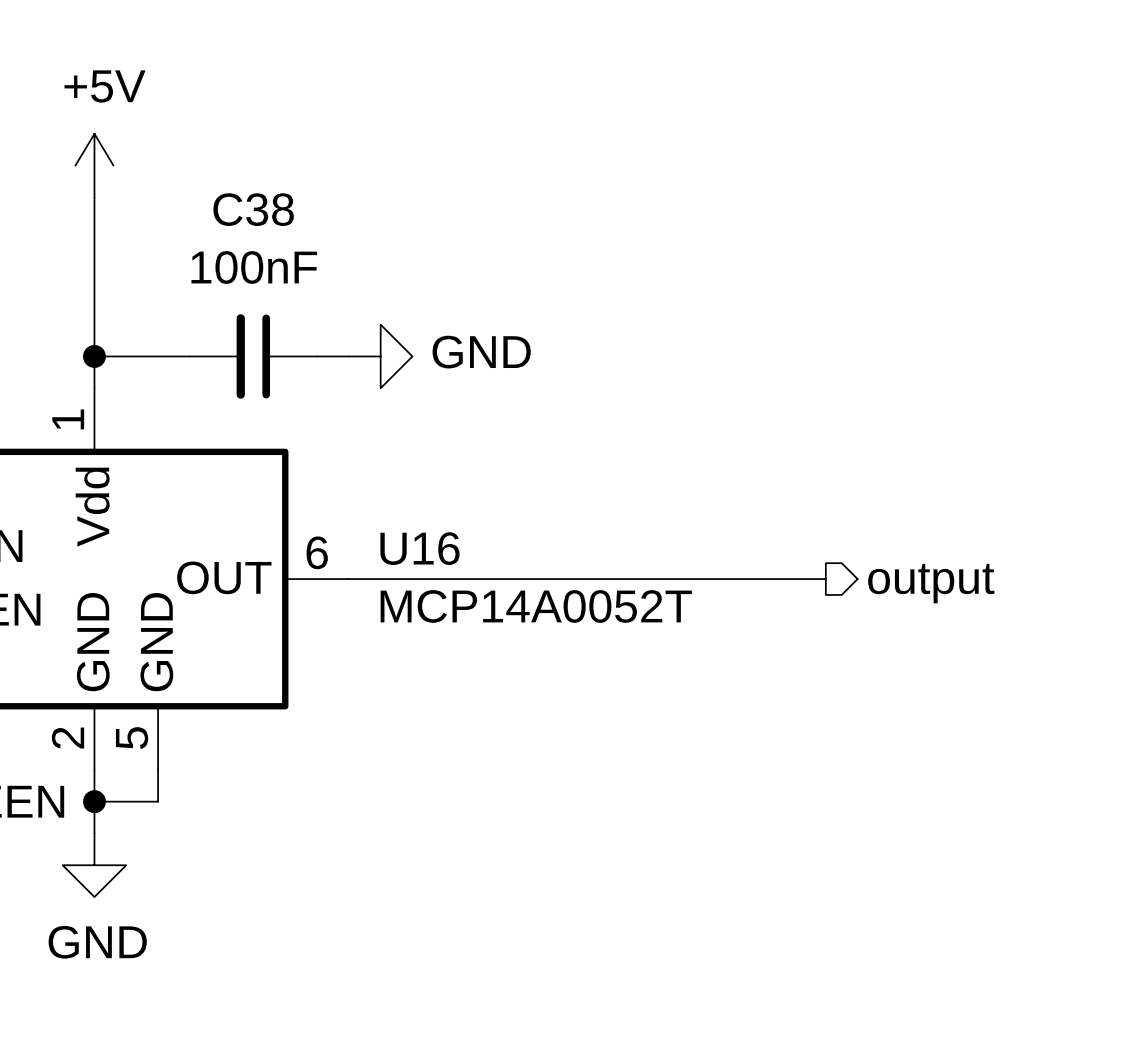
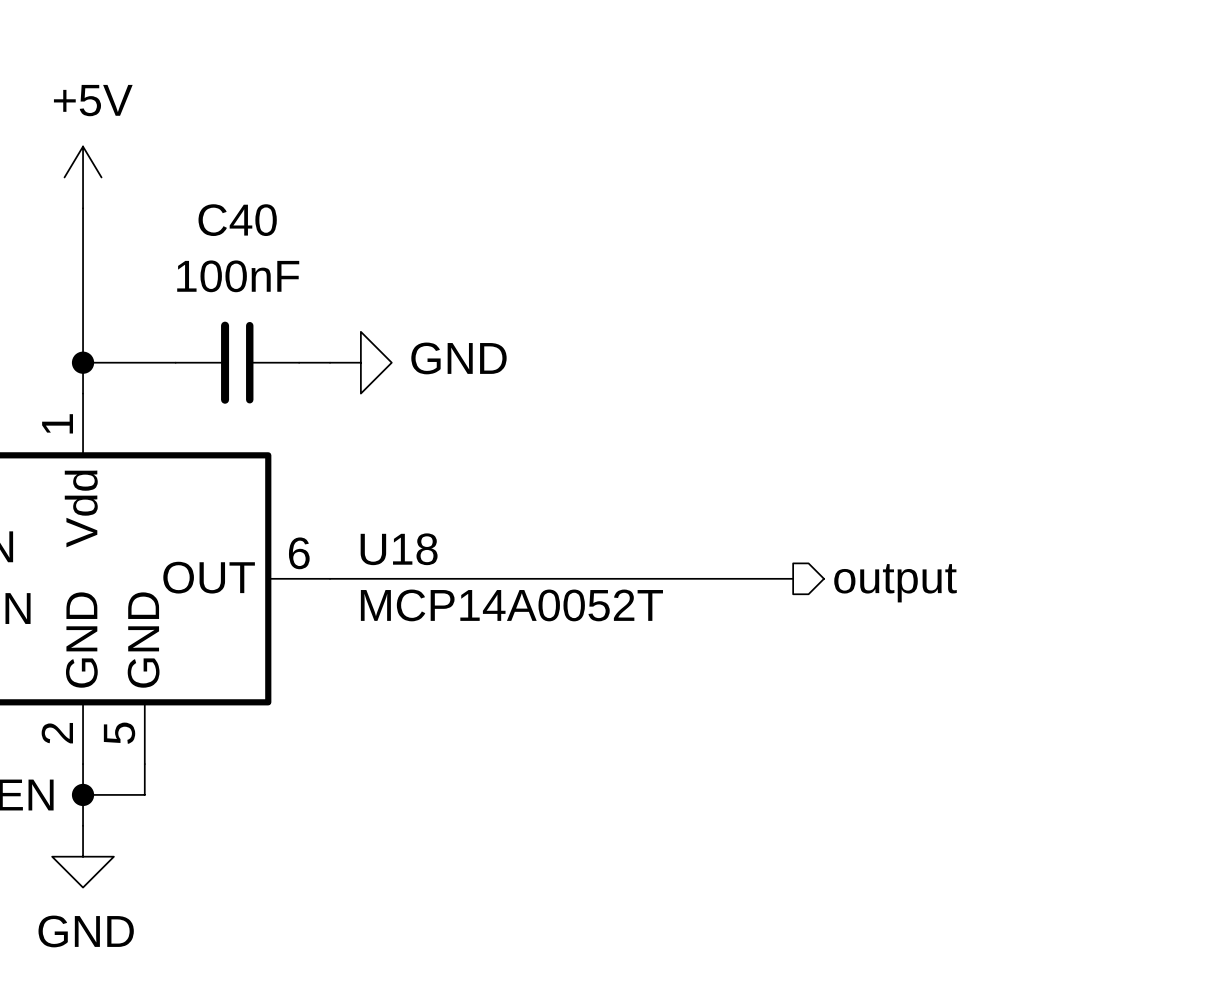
C38 name: C38 (253, 209) -> C40 (237, 220)
U16 name: U16 (420, 548) -> U18 (399, 549)

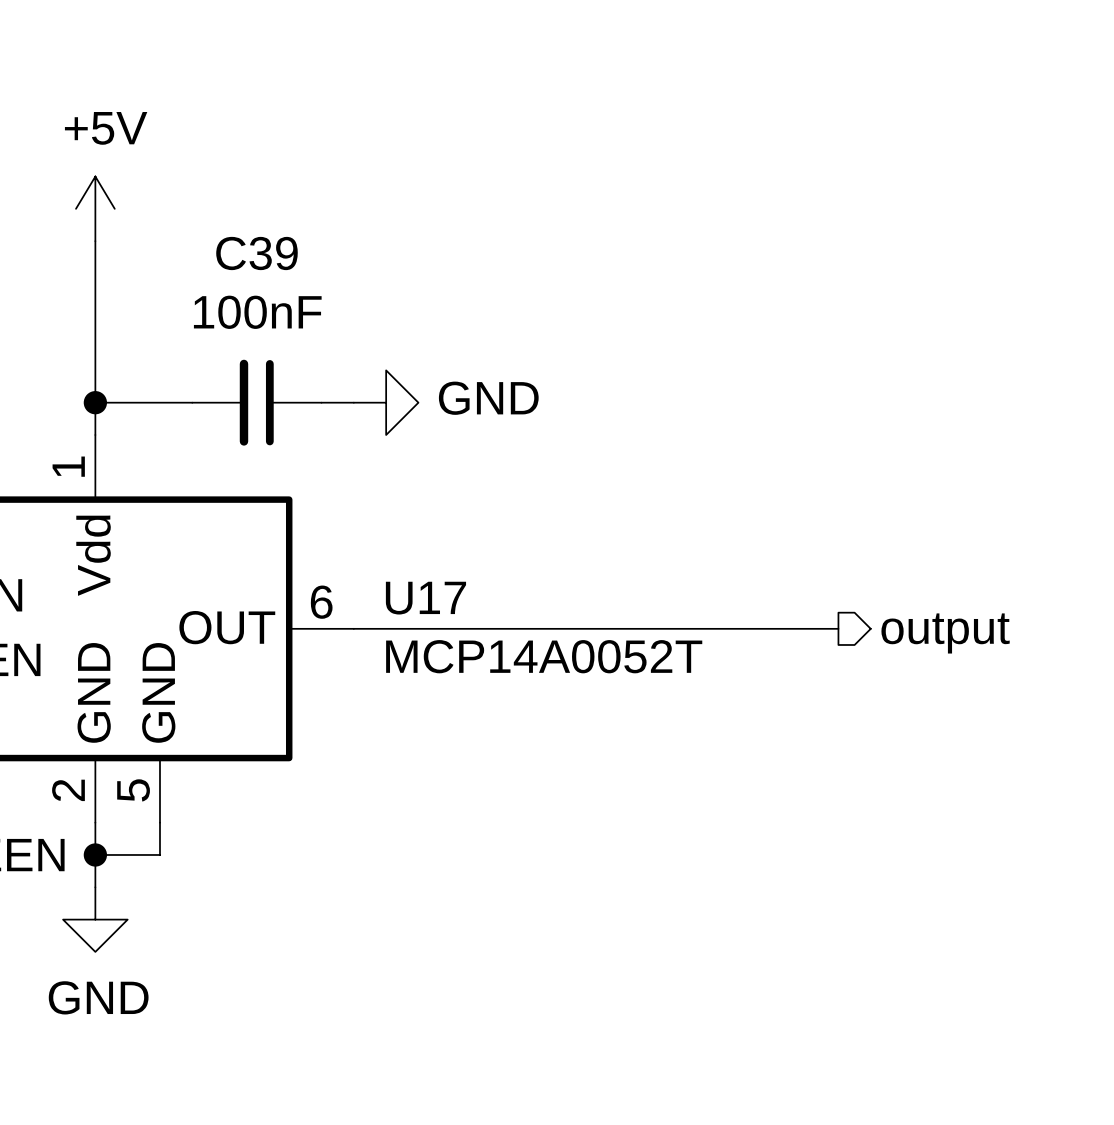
C40 name: C40 (237, 220) -> C39 (256, 253)
U18 name: U18 (399, 549) -> U17 (425, 598)

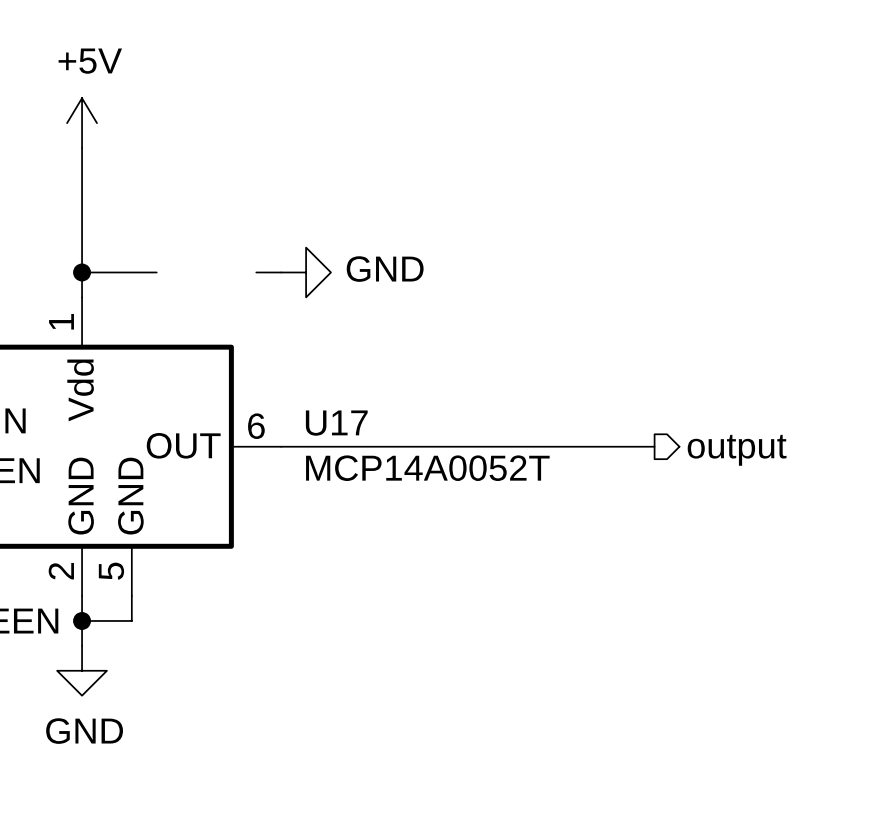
C39: 100nF (256, 402) -> none

